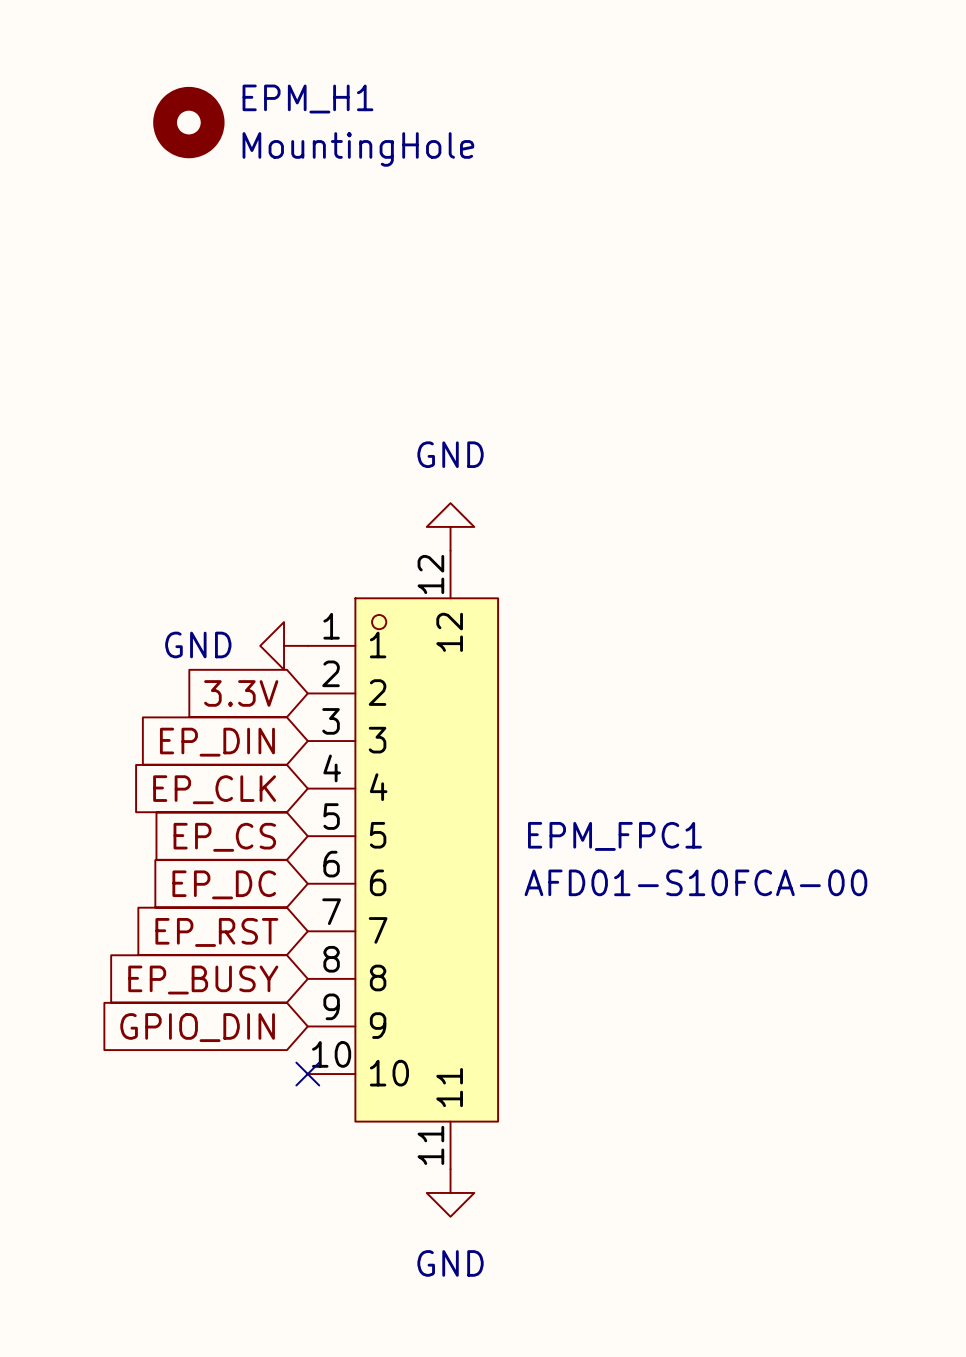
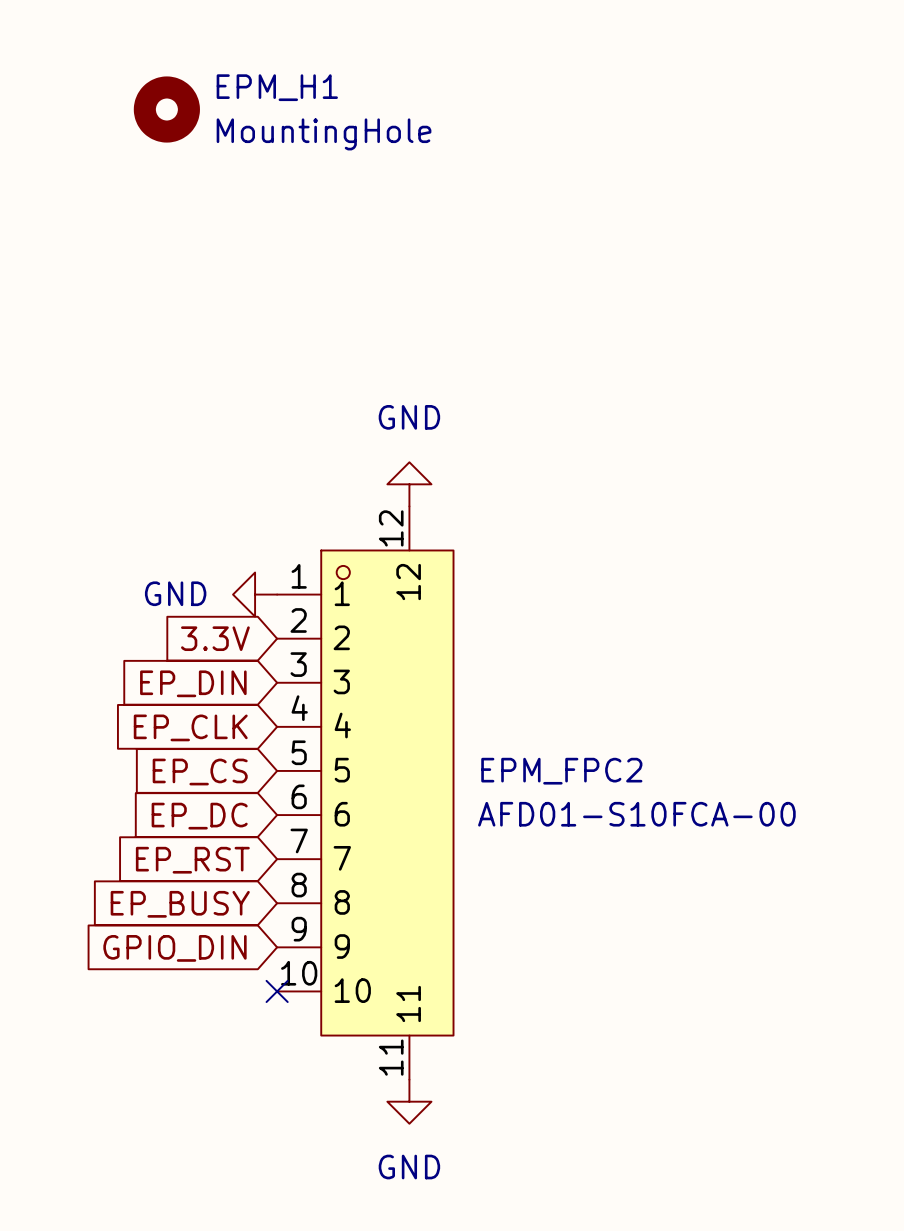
EPM_FPC1 name: EPM_FPC1 (614, 836) -> EPM_FPC2 (561, 771)

